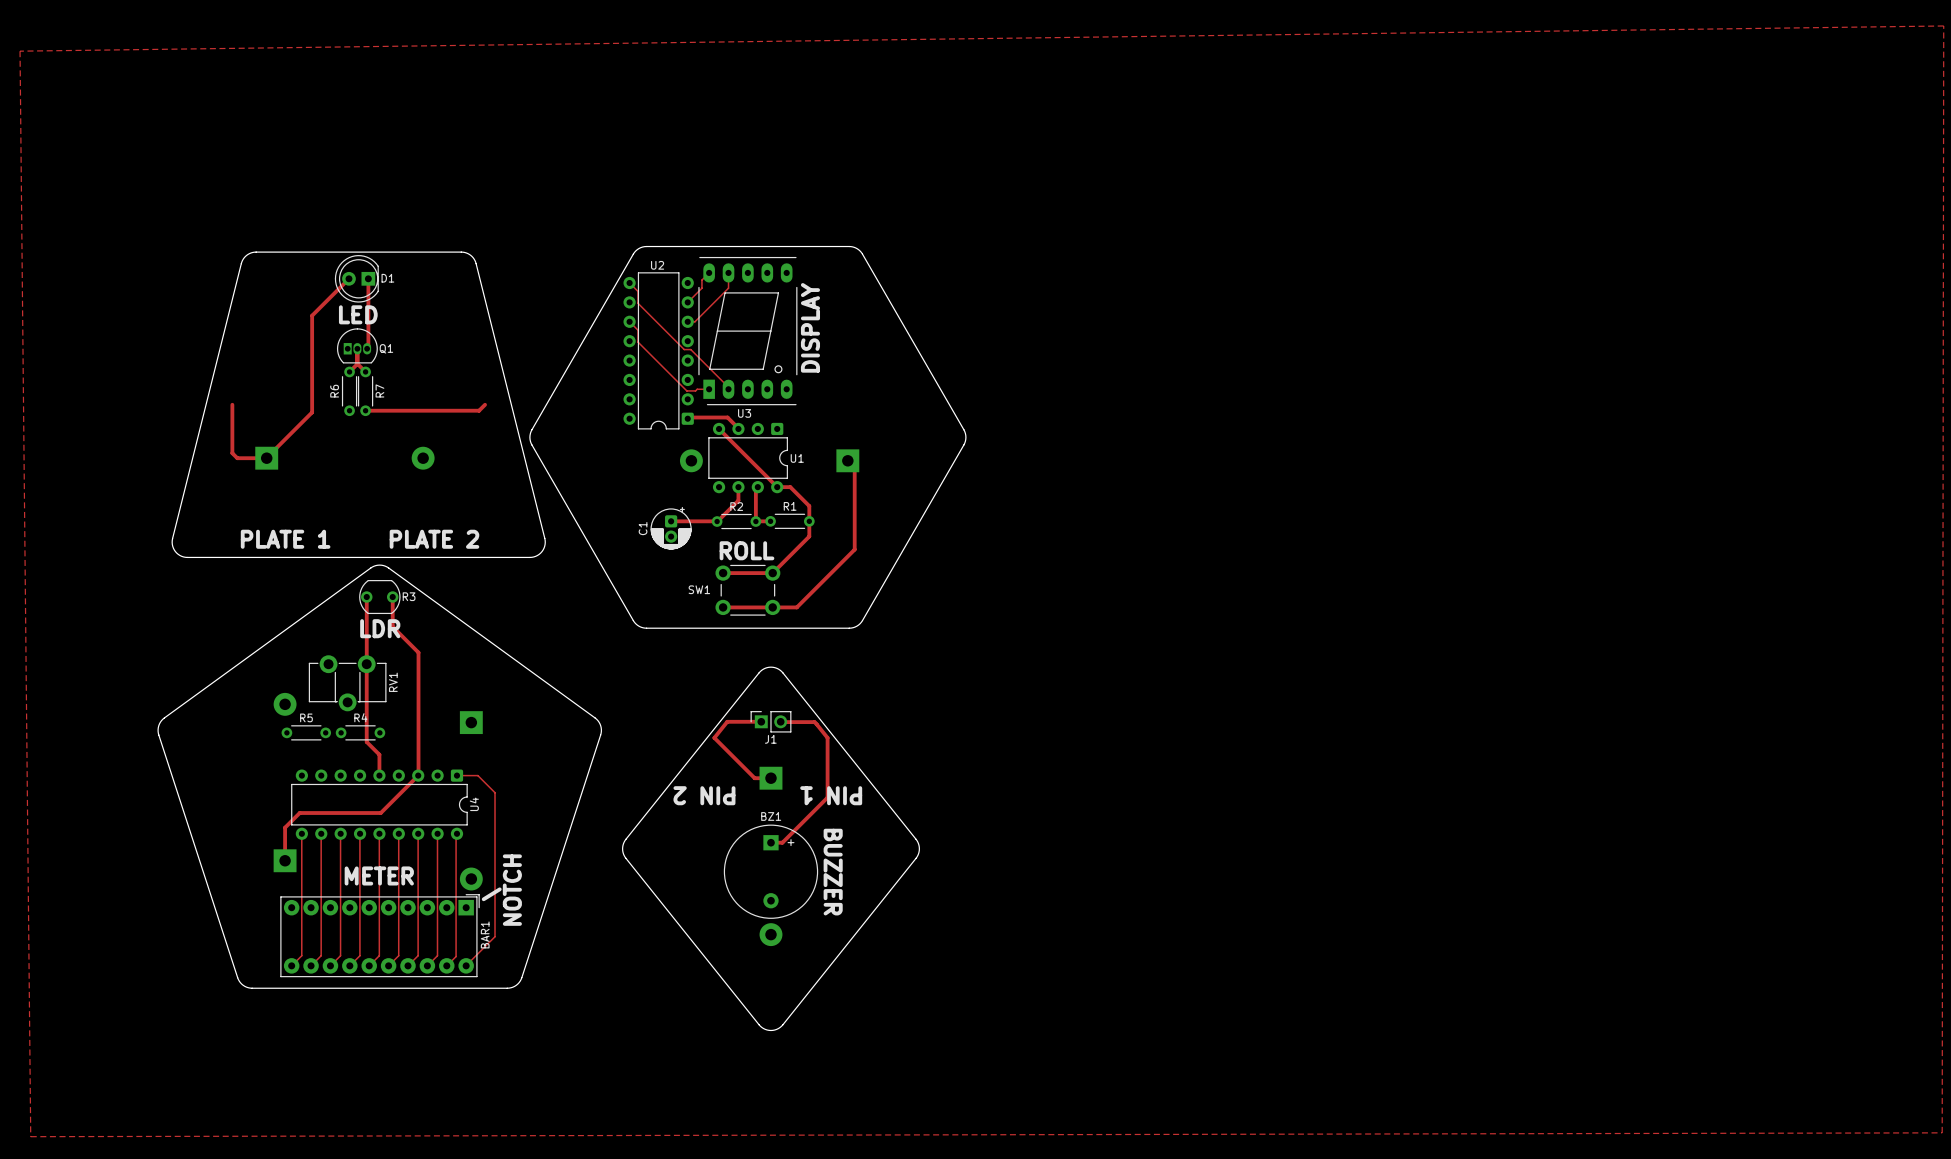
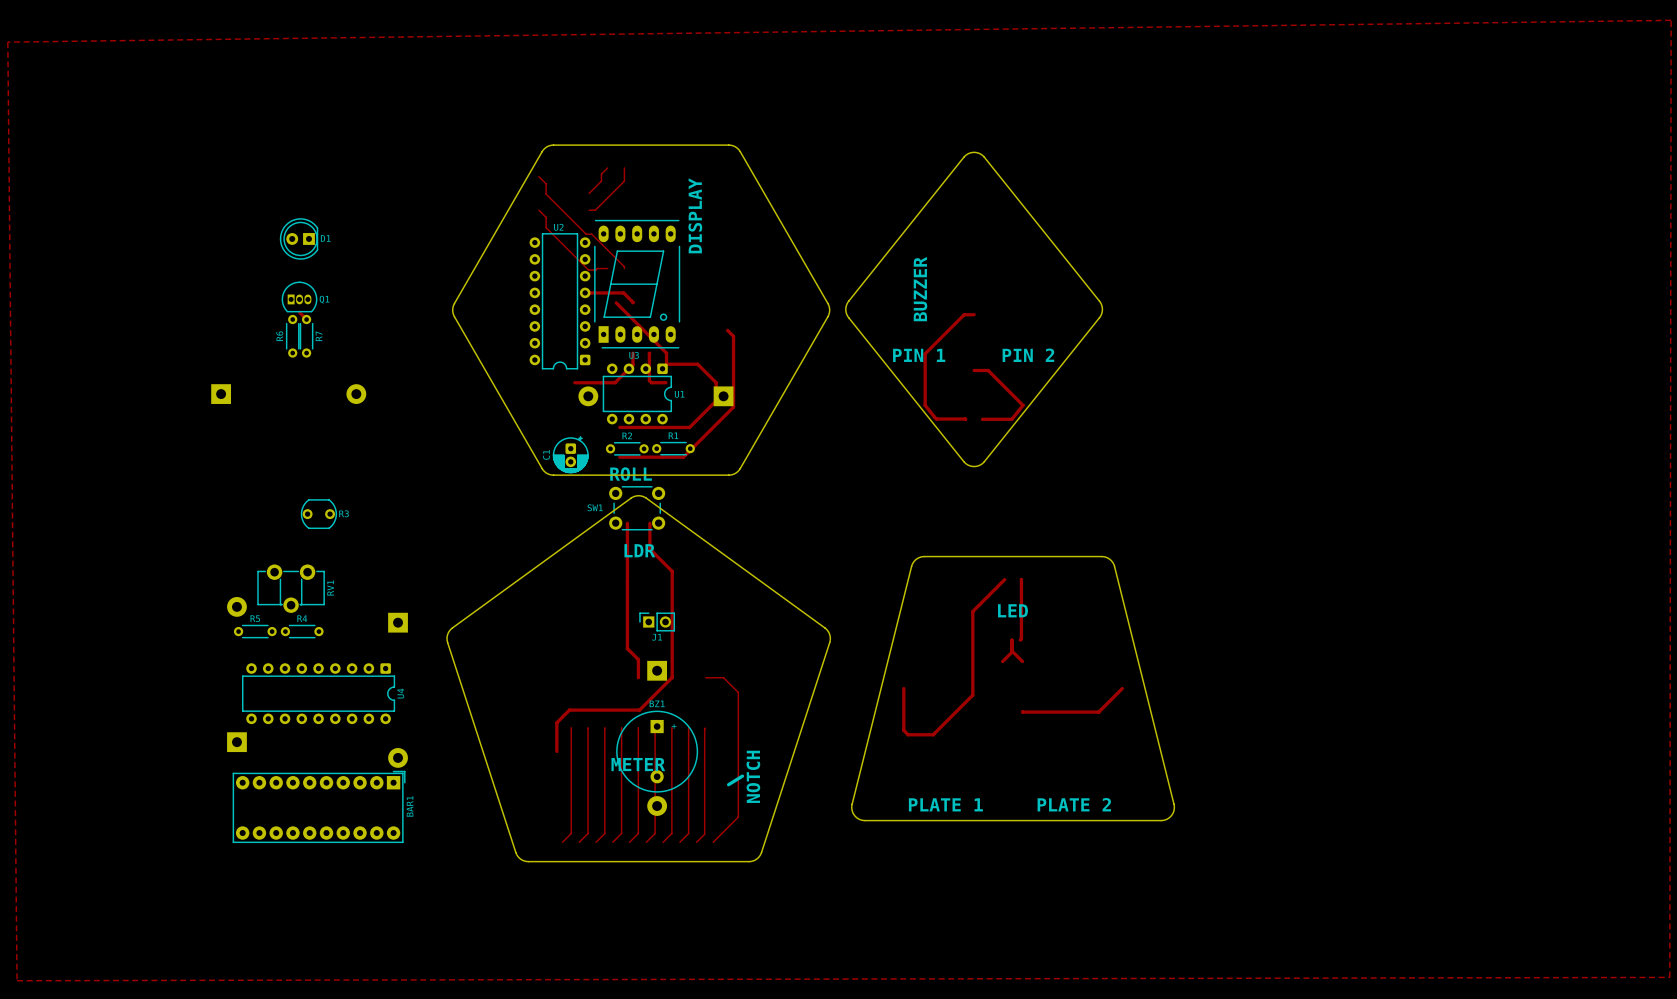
board edge: none -> (963, 157) (848, 301) (845, 309) (848, 317) (963, 461) (974, 466) (984, 461) (1099, 317) (1102, 309) (1099, 301) (983, 156) (972, 152) (963, 157)
board edge: (646, 246) (849, 246) (856, 248) (862, 254) (963, 429) (965, 437) (963, 444) (862, 620) (856, 626) (849, 628) (646, 628) (638, 626) (633, 620) (531, 444) (529, 437) (531, 429) (633, 254) (638, 248) (646, 246) -> (553, 145) (546, 146) (542, 151) (454, 303) (452, 310) (454, 316) (542, 468) (546, 473) (553, 475) (728, 475) (735, 473) (740, 468) (827, 316) (829, 310) (827, 303) (740, 151) (735, 146) (728, 145) (553, 145)
board edge: (256, 252) (461, 252) (471, 256) (476, 263) (544, 538) (544, 546) (540, 553) (529, 557) (187, 557) (176, 553) (172, 546) (172, 538) (241, 263) (246, 255) (256, 252) -> none
track: (709, 272) (701, 280) (701, 288) (687, 302) -> (607, 167) (601, 174) (601, 181) (589, 193)
track: (728, 272) (728, 288) (694, 321) (687, 321) -> (624, 167) (624, 181) (595, 210) (589, 210)
track: (348, 278) (312, 315) (312, 412) (266, 458) (237, 458) (232, 453) (232, 404) -> none
track: (368, 278) (367, 348) -> none
track: (629, 283) (637, 291) (637, 303) (684, 349) (690, 349) (728, 389) -> (538, 176) (546, 183) (546, 194) (586, 234) (591, 234) (624, 268)
text: LED (358, 314) -> none
track: (629, 321) (637, 330) (637, 342) (686, 390) (709, 389) -> (538, 210) (546, 217) (546, 227) (588, 269) (607, 268)
text position: DISPLAY (810, 327) -> DISPLAY (695, 215)
text: none -> BUZZER (920, 289)
track: (357, 348) (357, 364) (349, 371) -> none
track: none -> (616, 302) (666, 353) (666, 364) (697, 364) (716, 382) (716, 400) (689, 427) (619, 427)
track: none -> (974, 314) (964, 314) (925, 353) (925, 405) (936, 419) (965, 419)
track: (485, 404) (479, 410) (365, 410) -> none
track: none -> (633, 353) (633, 364) (615, 382) (574, 382)
track: none -> (649, 353) (649, 380) (651, 382) (665, 382)
text: none -> PIN 1 (919, 355)
text: none -> PIN 2 (1028, 355)
track: (687, 418) (727, 417) (738, 428) -> (589, 294) (623, 292) (633, 302)
track: (719, 428) (777, 487) (790, 487) (809, 506) (809, 536) (772, 573) (723, 573) -> none
track: none -> (974, 370) (988, 370) (1023, 405) (1011, 419) (982, 419)
track: (847, 460) (854, 467) (854, 549) (796, 607) (723, 607) -> (727, 330) (733, 336) (733, 407) (683, 457) (619, 457)
track: (738, 487) (738, 500) (717, 521) (671, 521) -> none
track: (757, 487) (755, 489) (755, 521) (770, 521) -> none
text: PLATE 1 (285, 539) -> none
text: PLATE 2 (434, 539) -> none
board edge: (370, 568) (164, 717) (158, 725) (158, 735) (237, 977) (243, 985) (252, 988) (512, 987) (521, 977) (600, 735) (600, 725) (595, 717) (388, 568) (379, 565) (370, 568) -> none
board edge: none -> (630, 498) (452, 627) (447, 634) (447, 642) (515, 852) (520, 859) (528, 861) (753, 860) (761, 852) (829, 642) (829, 634) (824, 627) (646, 498) (638, 495) (630, 498)
track: (366, 597) (366, 741) (379, 754) (379, 775) -> none
track: (392, 597) (392, 626) (418, 652) (418, 775) (380, 813) (299, 813) (285, 827) (285, 860) -> none
track: none -> (627, 523) (627, 581)
track: none -> (649, 523) (649, 549) (672, 571) (672, 677) (639, 710) (569, 710) (556, 722) (556, 751)
text: LDR (380, 628) -> none
text: none -> LDR (639, 550)
board edge: none -> (924, 556) (1101, 556) (1110, 560) (1114, 566) (1173, 804) (1173, 810) (1170, 816) (1161, 820) (864, 820) (855, 816) (852, 810) (852, 804) (911, 566) (916, 559) (924, 556)
board edge: (759, 672) (625, 839) (622, 848) (625, 858) (759, 1024) (770, 1030) (782, 1024) (916, 858) (919, 848) (916, 839) (781, 671) (769, 667) (759, 672) -> none
track: none -> (1004, 579) (972, 611) (972, 695) (933, 734) (908, 734) (903, 730) (903, 688)
track: none -> (1021, 579) (1020, 640)
track: none -> (627, 581) (627, 648) (638, 659) (638, 677)
text: none -> LED (1012, 610)
track: (761, 721) (727, 721) (714, 737) (754, 778) (770, 778) -> none
track: (780, 721) (814, 722) (827, 737) (827, 797) (782, 842) (770, 842) -> none
track: none -> (1011, 640) (1011, 652) (1002, 661)
track: none -> (1011, 650) (1022, 661)
track: (456, 775) (477, 775) (495, 792) (495, 936) (466, 965) -> none
track: none -> (705, 677) (723, 677) (738, 692) (738, 817) (713, 842)
text: PIN 2 (704, 795) -> none
text: PIN 1 (831, 795) -> none
track: none -> (1122, 688) (1098, 712) (1022, 711)
track: (301, 833) (301, 955) (291, 965) -> none
track: (321, 833) (321, 955) (311, 965) -> none
track: (340, 833) (340, 955) (330, 965) -> none
track: (359, 833) (359, 955) (349, 965) -> none
track: (379, 833) (379, 955) (369, 965) -> none
track: (398, 833) (398, 955) (388, 965) -> none
track: (418, 833) (418, 955) (408, 965) -> none
track: (437, 833) (437, 955) (427, 965) -> none
track: (456, 833) (456, 956) (446, 965) -> none
track: none -> (571, 728) (571, 833) (562, 842)
track: none -> (588, 728) (588, 833) (579, 842)
track: none -> (604, 728) (604, 833) (596, 842)
track: none -> (621, 728) (621, 833) (612, 842)
track: none -> (638, 728) (638, 833) (629, 842)
track: none -> (655, 728) (655, 833) (646, 842)
track: none -> (671, 728) (671, 833) (663, 842)
track: none -> (688, 728) (688, 833) (679, 842)
track: none -> (705, 728) (704, 834) (696, 842)
text: BUZZER (833, 872) -> none
text: METER (379, 875) -> none
text: none -> METER (638, 764)
line: (499, 889) (483, 899) -> none
text: NOTCH (512, 890) -> none
line: none -> (742, 776) (728, 784)
text: none -> NOTCH (753, 776)
text: none -> PLATE 1 (945, 804)
text: none -> PLATE 2 (1074, 804)

